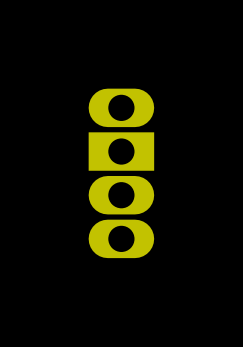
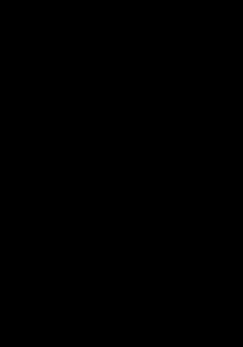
part: (121, 173) -> none

